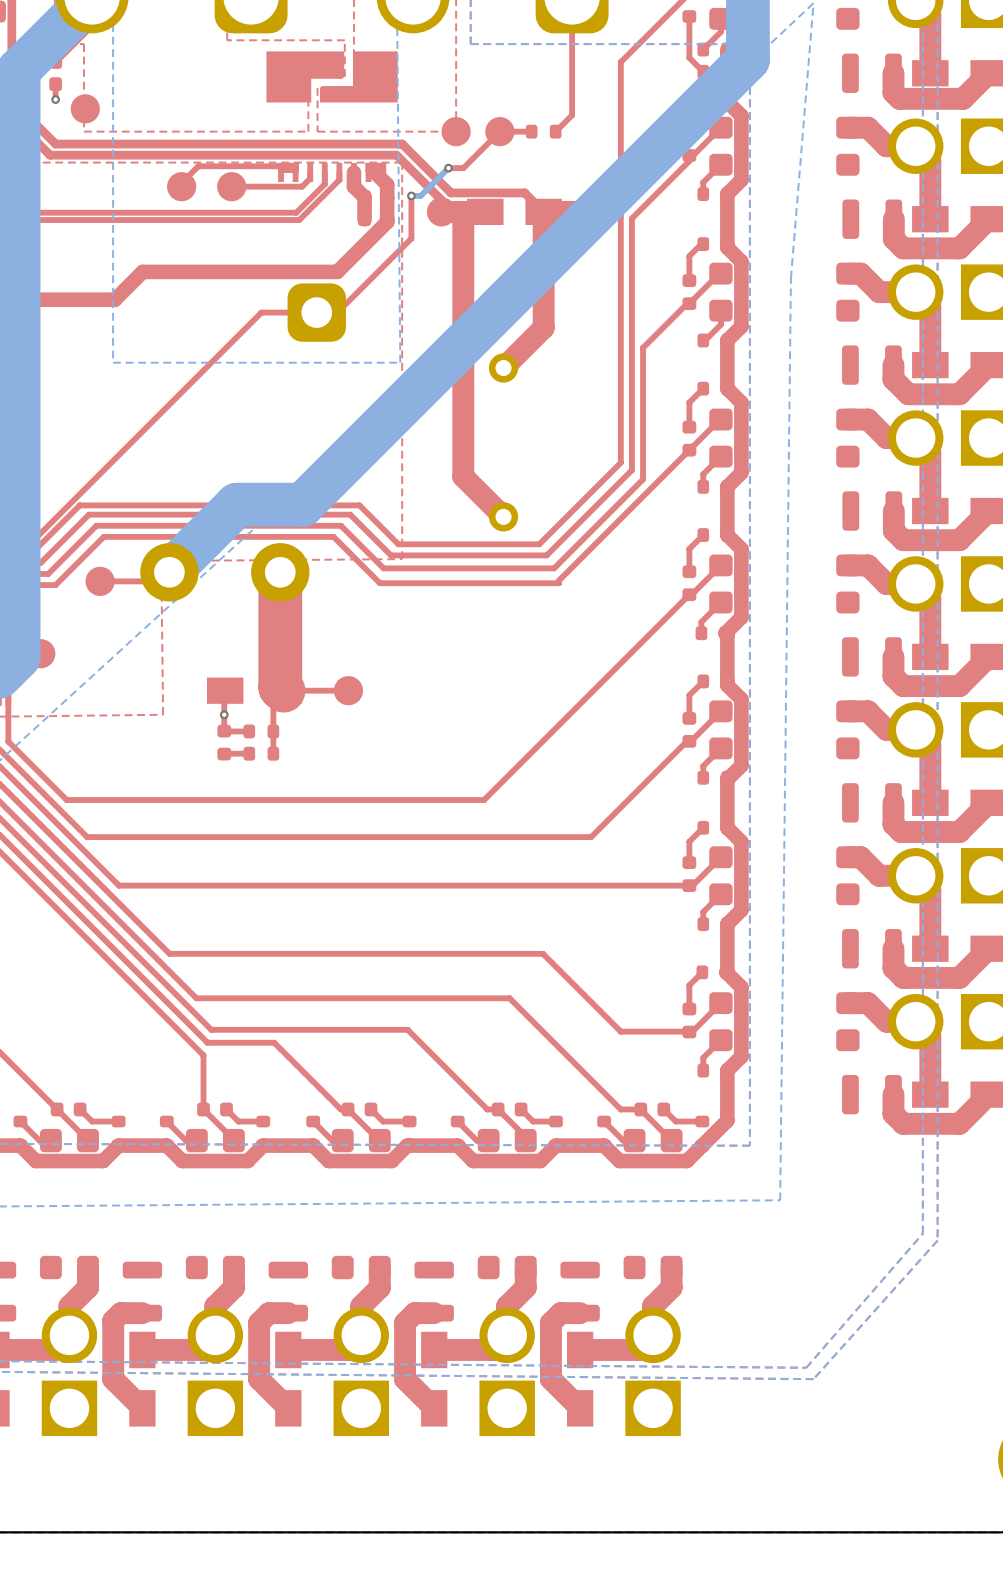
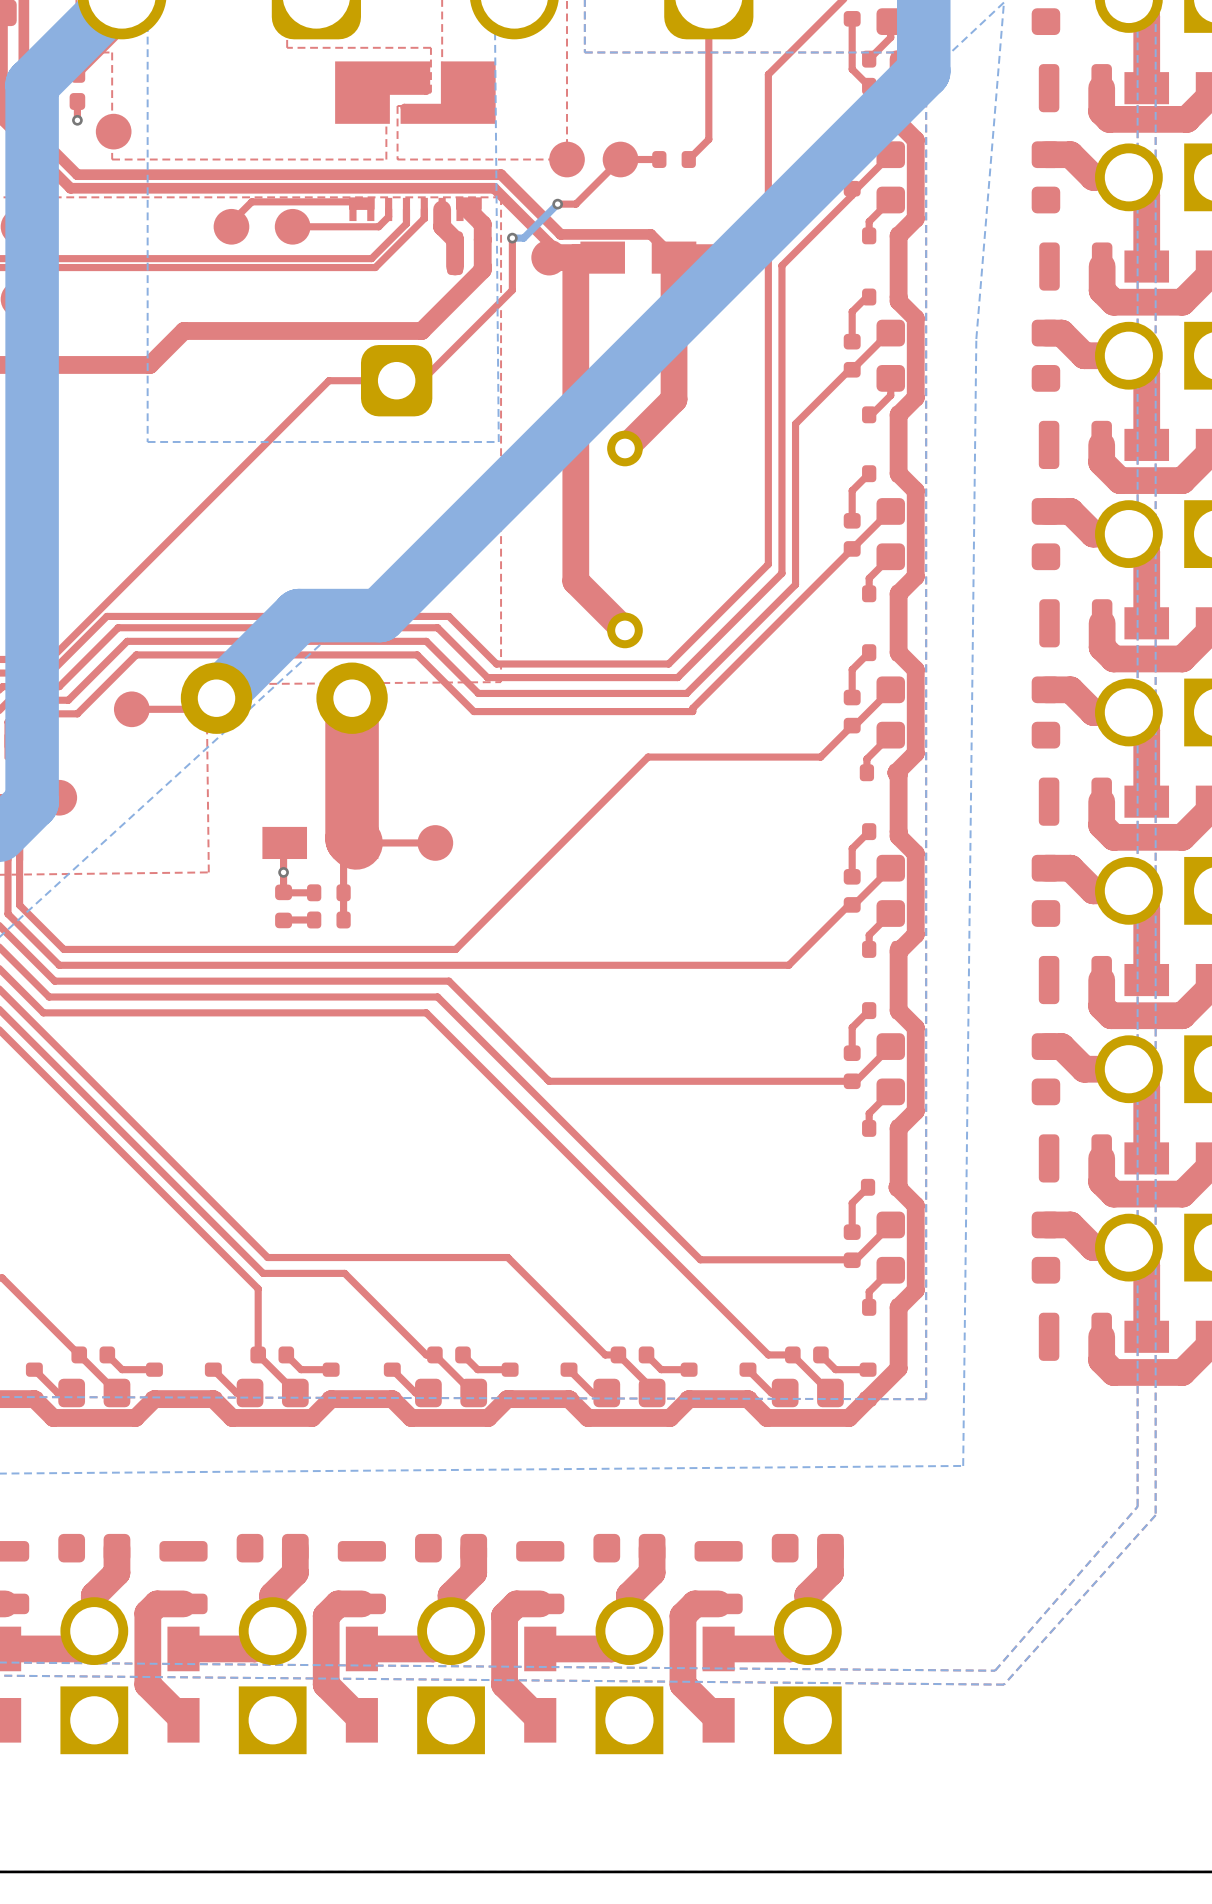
top track: (663, 620) (484, 800) (66, 800) (44, 777) -> (820, 757) (648, 757) (455, 949) (63, 949)
top track: (637, 790) (591, 837) (87, 837) (40, 790) -> (788, 965) (59, 965)
top track: (37, 803) (119, 885) (441, 885) -> (54, 981) (448, 981) (549, 1081)
top track: (32, 816) (169, 953) (542, 953) (620, 1031) -> (49, 997) (437, 997) (700, 1259) (768, 1259)
top track: (27, 829) (196, 998) (509, 998) -> (43, 1012) (426, 1012) (632, 1219)

